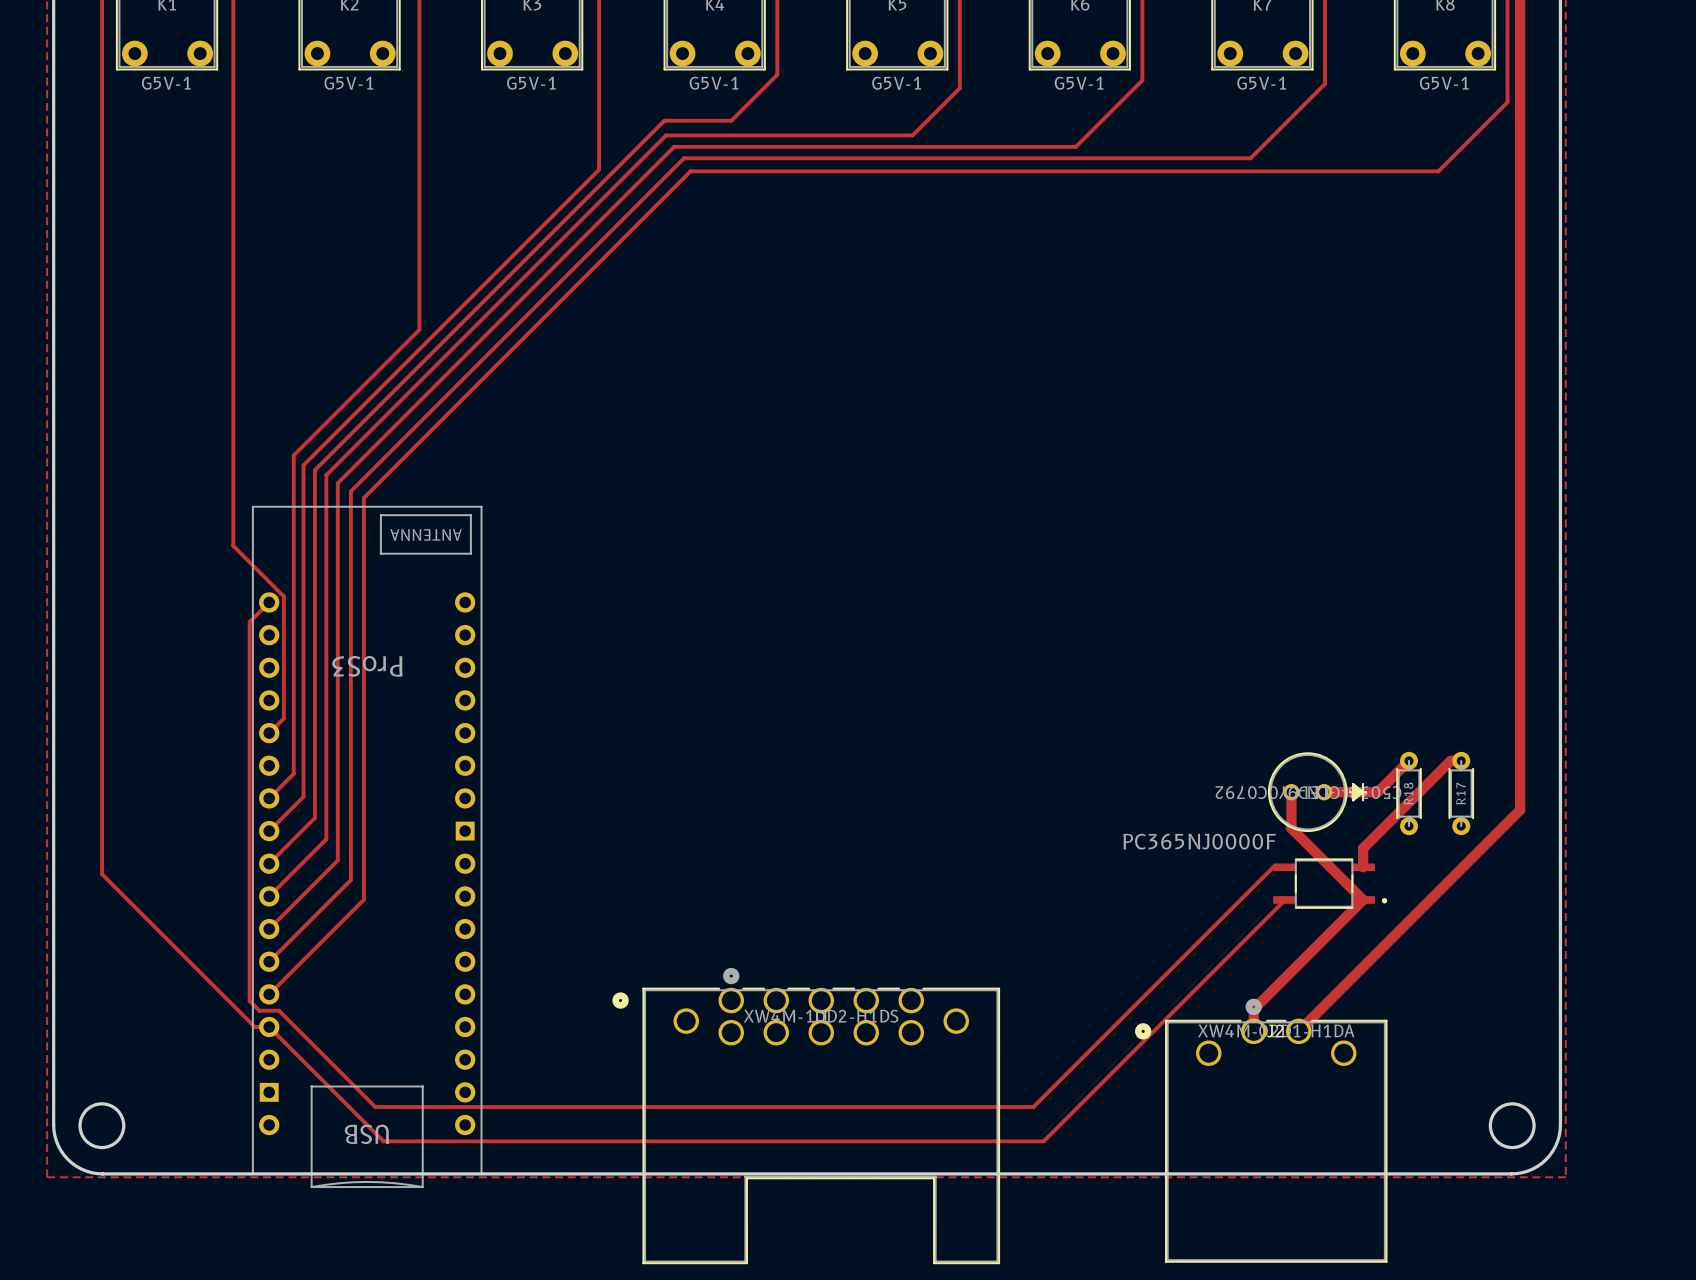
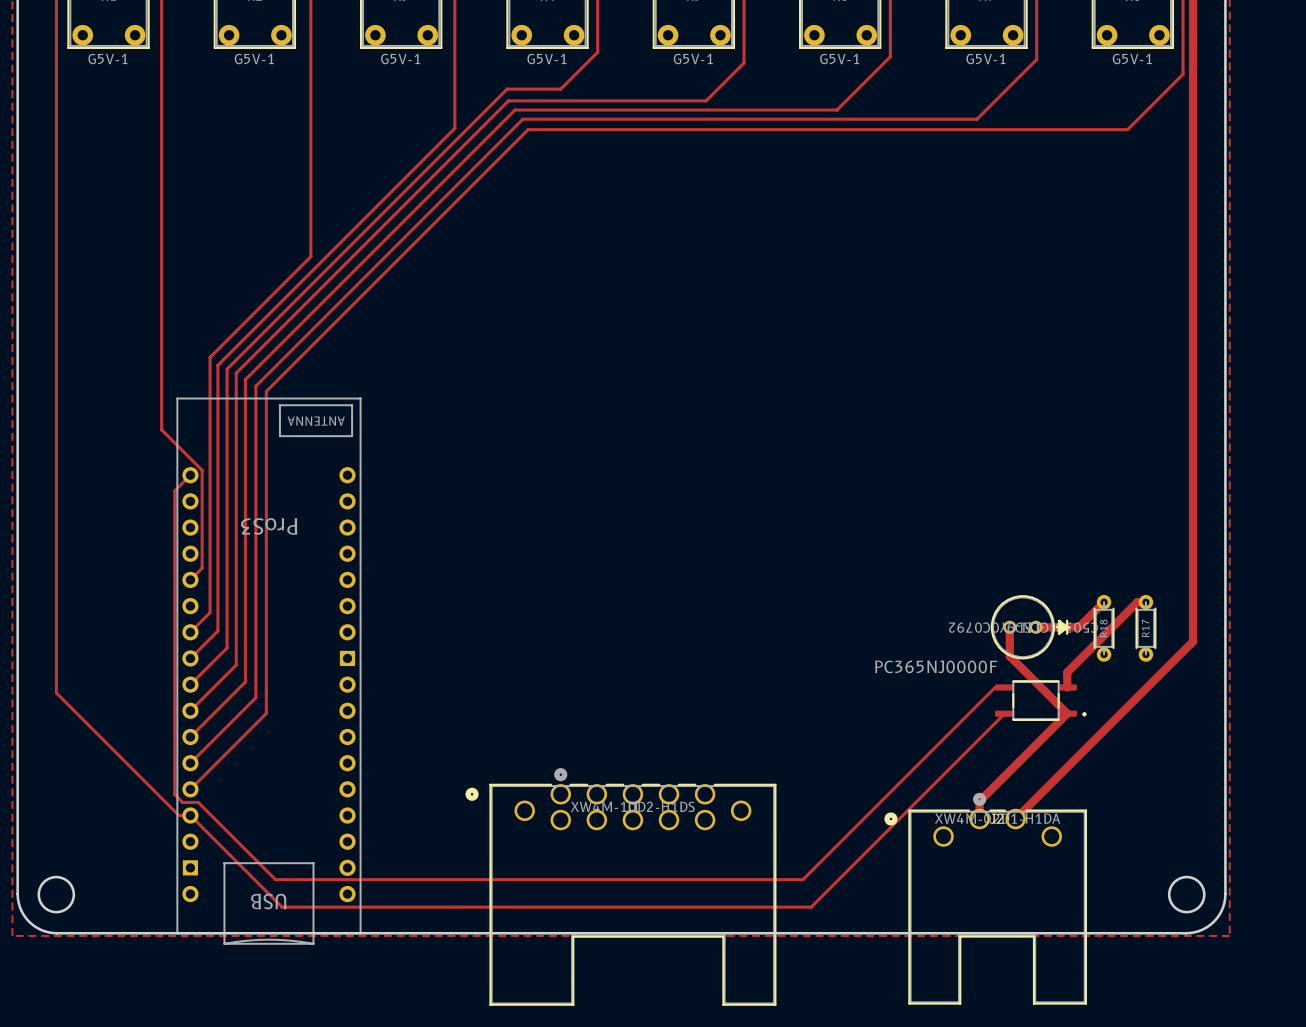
J2 footprint: [1135, 998, 1388, 1263] -> [884, 792, 1087, 1005]

